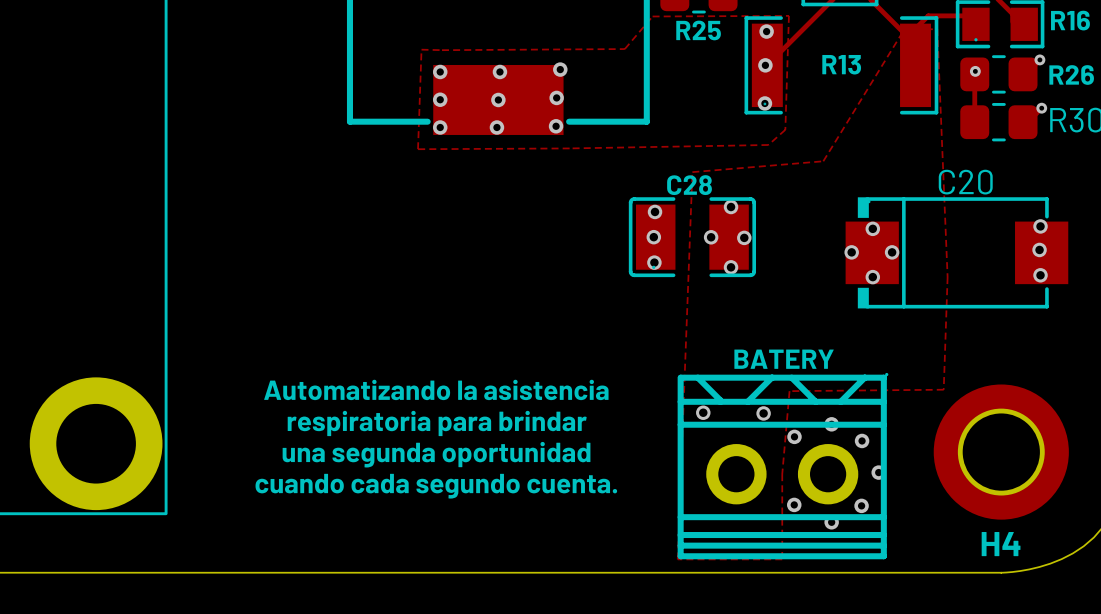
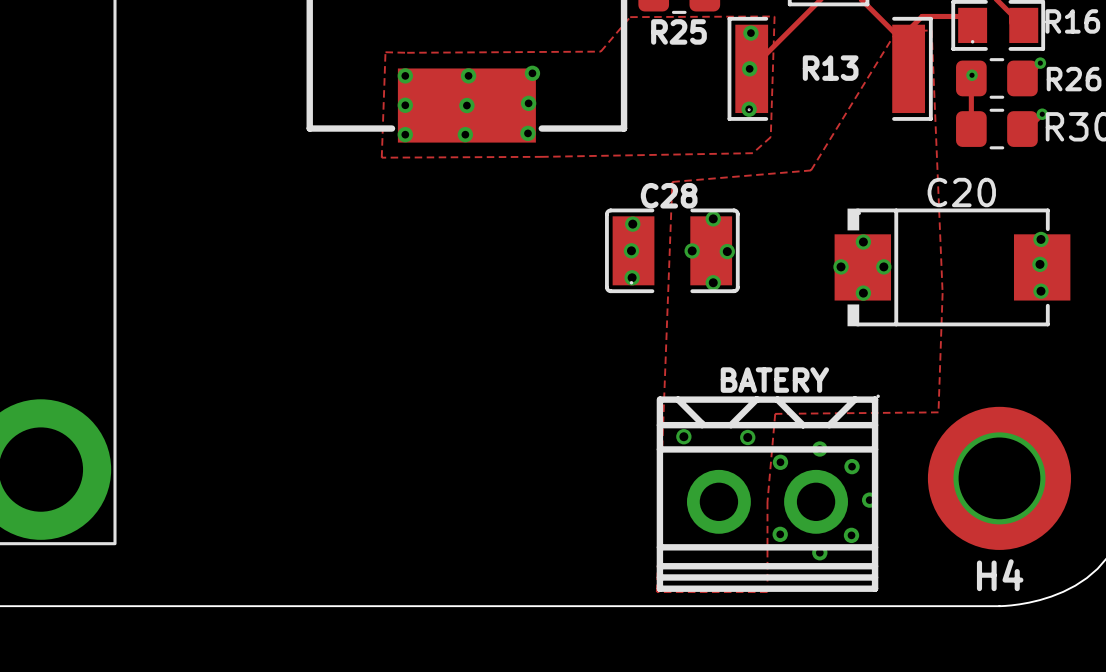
text: Automatizando la asistencia (436, 389) -> none
text: respiratoria para brindar (437, 423) -> none
text: una segunda oportunidad (436, 454) -> none
text: cuando cada segundo cuenta. (436, 486) -> none

